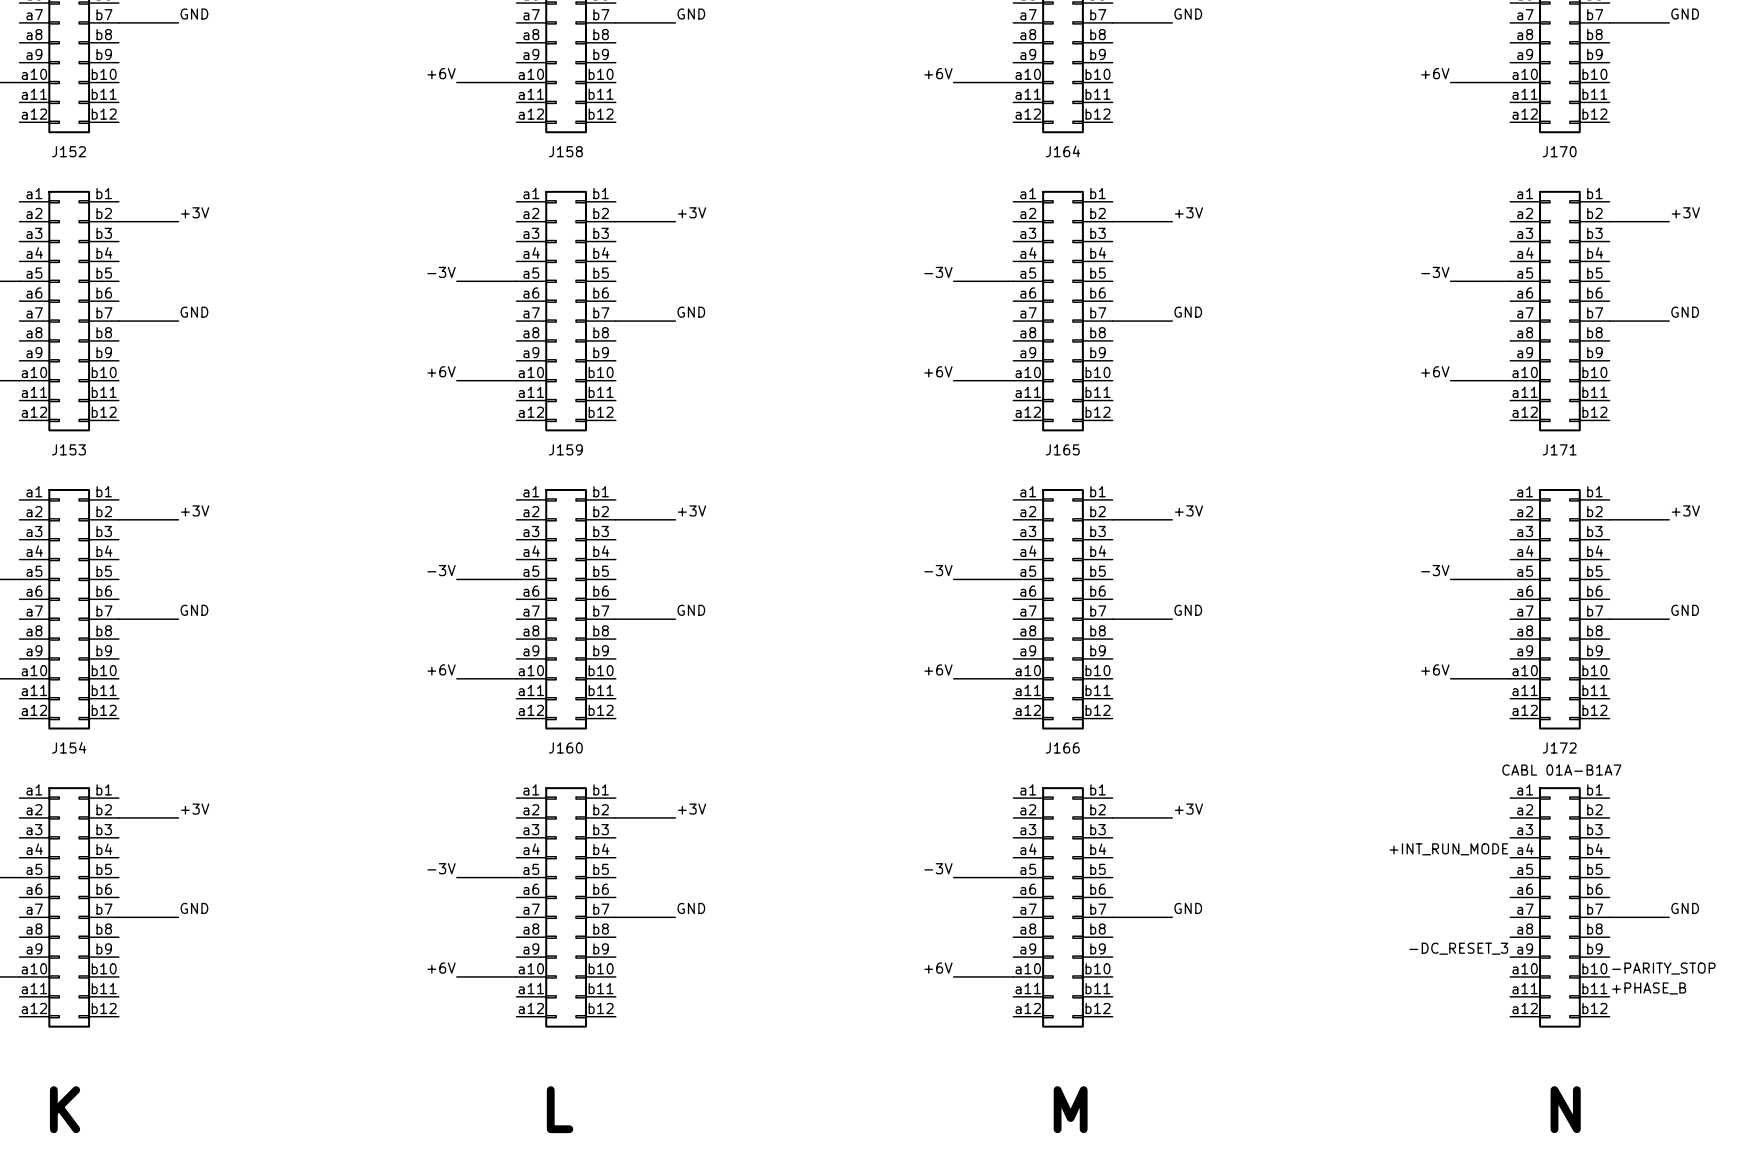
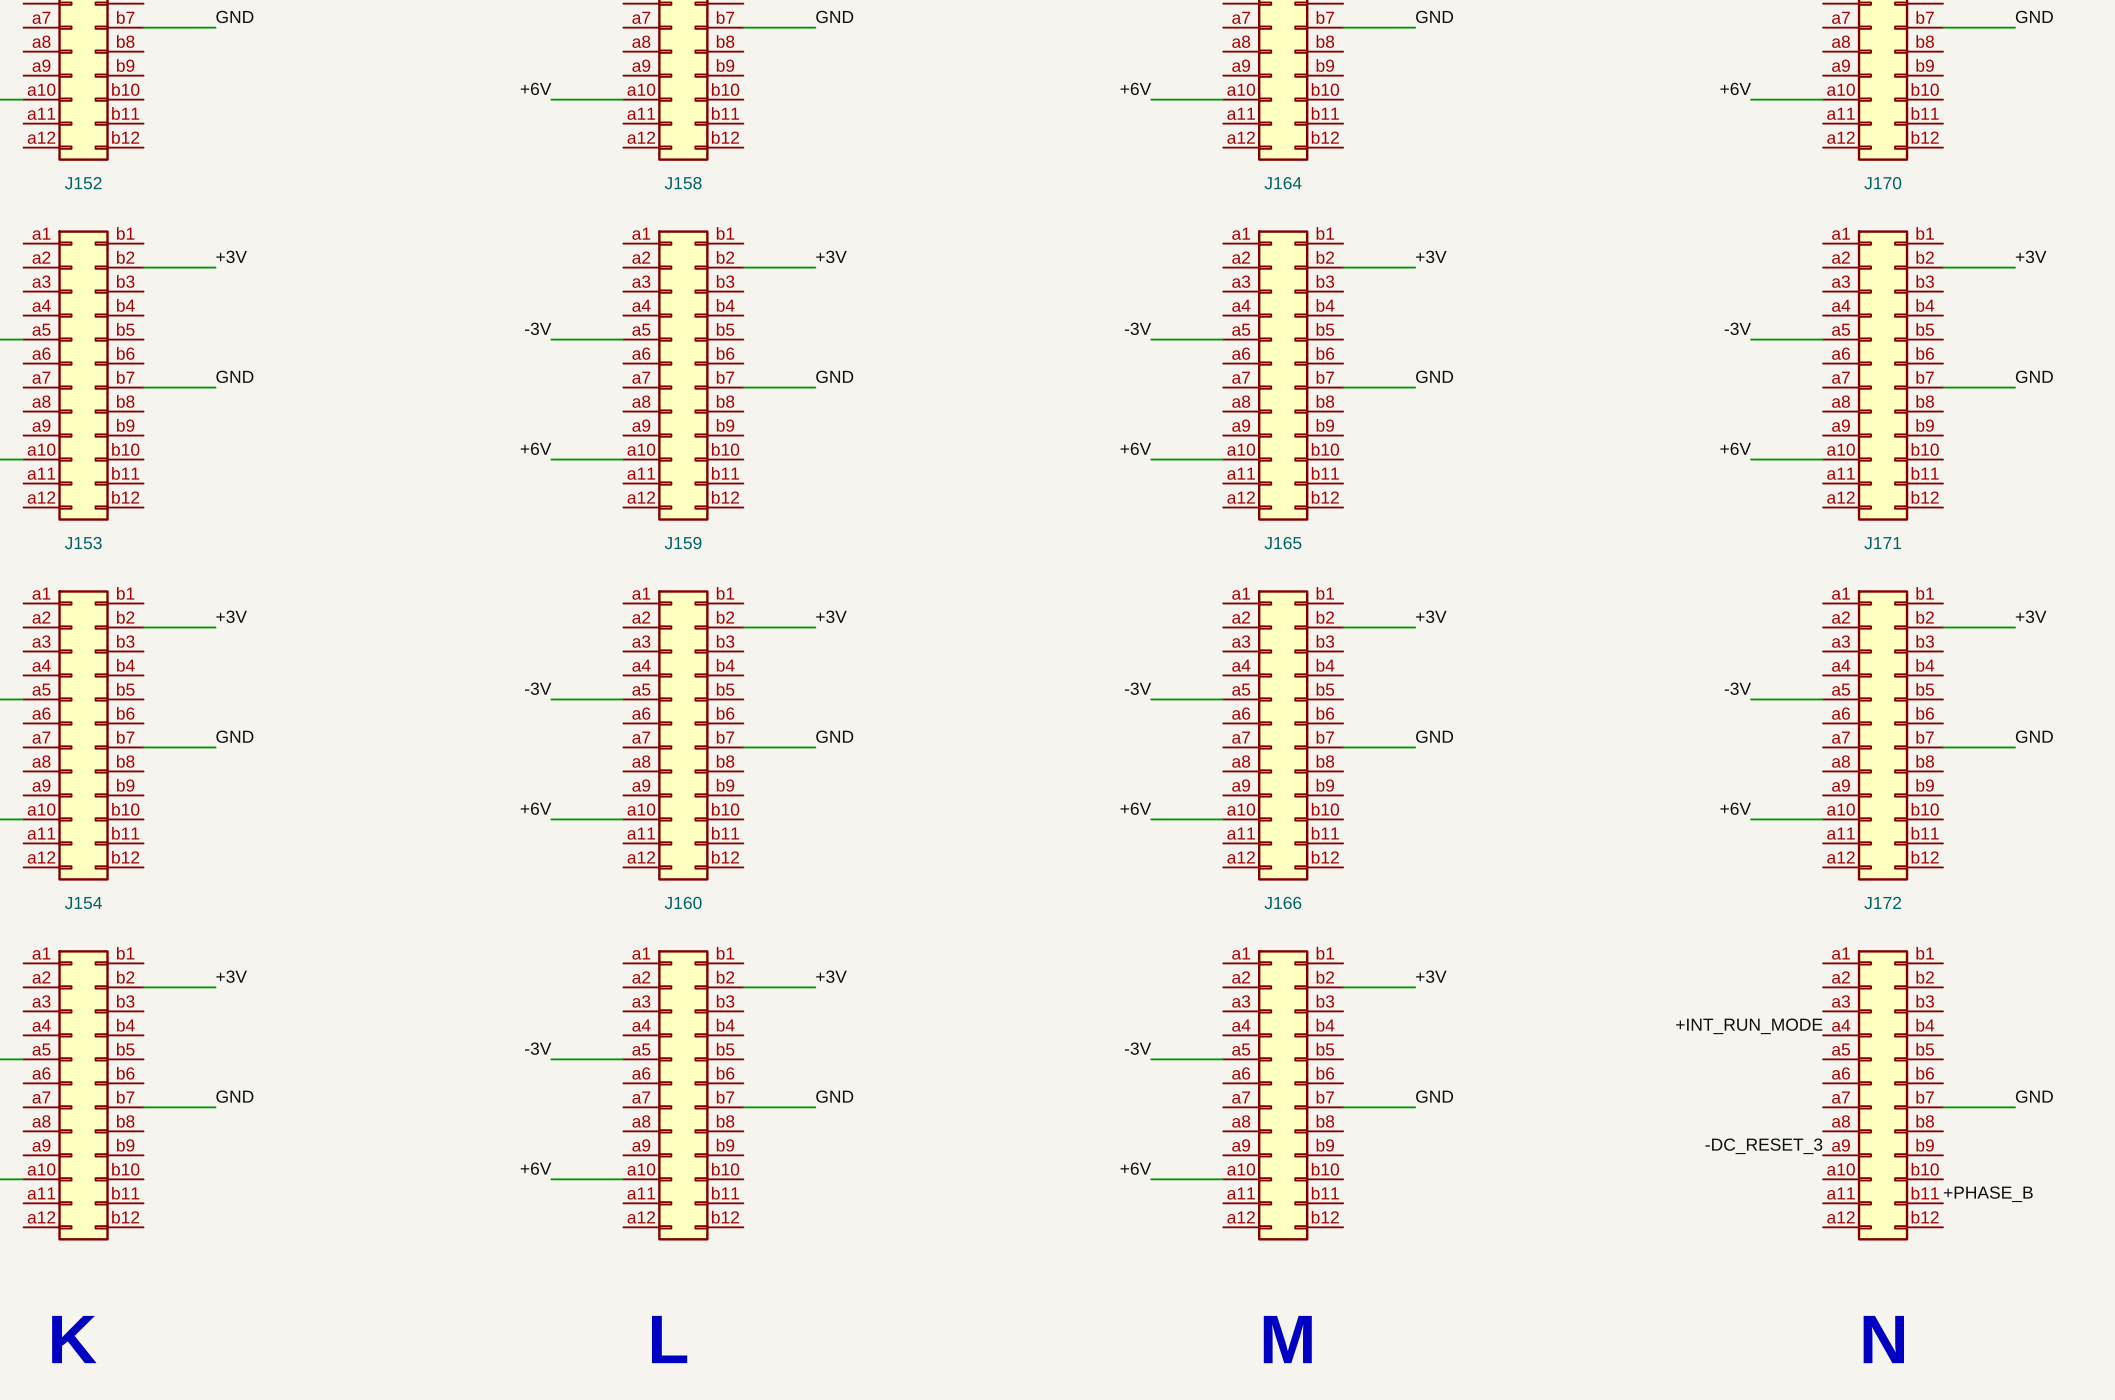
text: CABL 01A-B1A7 (1561, 770) -> none
label: -PARITY_STOP (1663, 968) -> none

